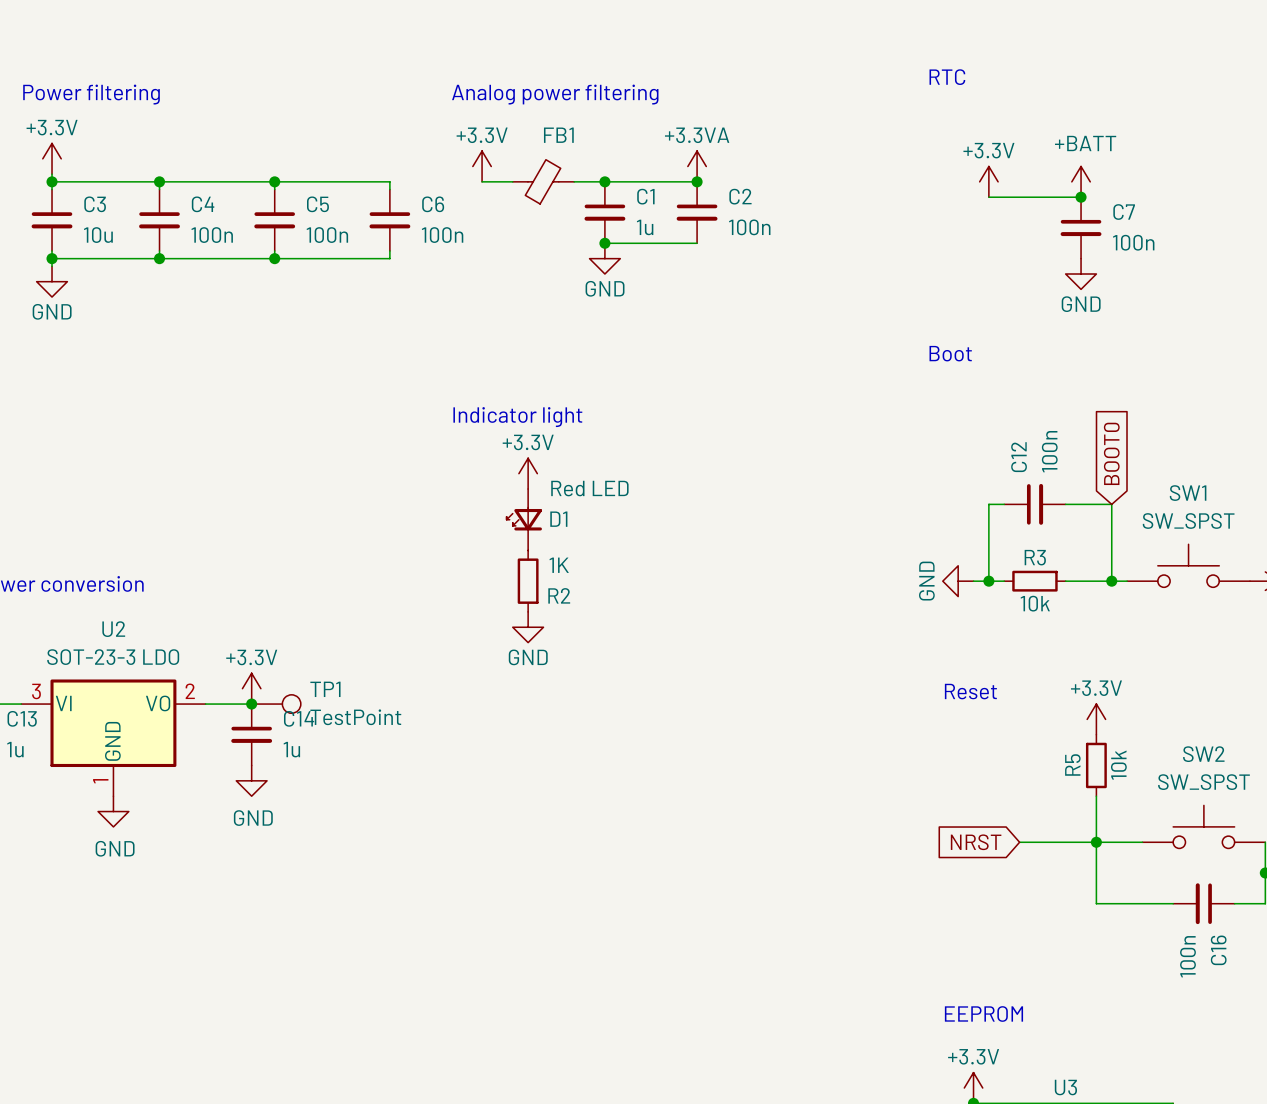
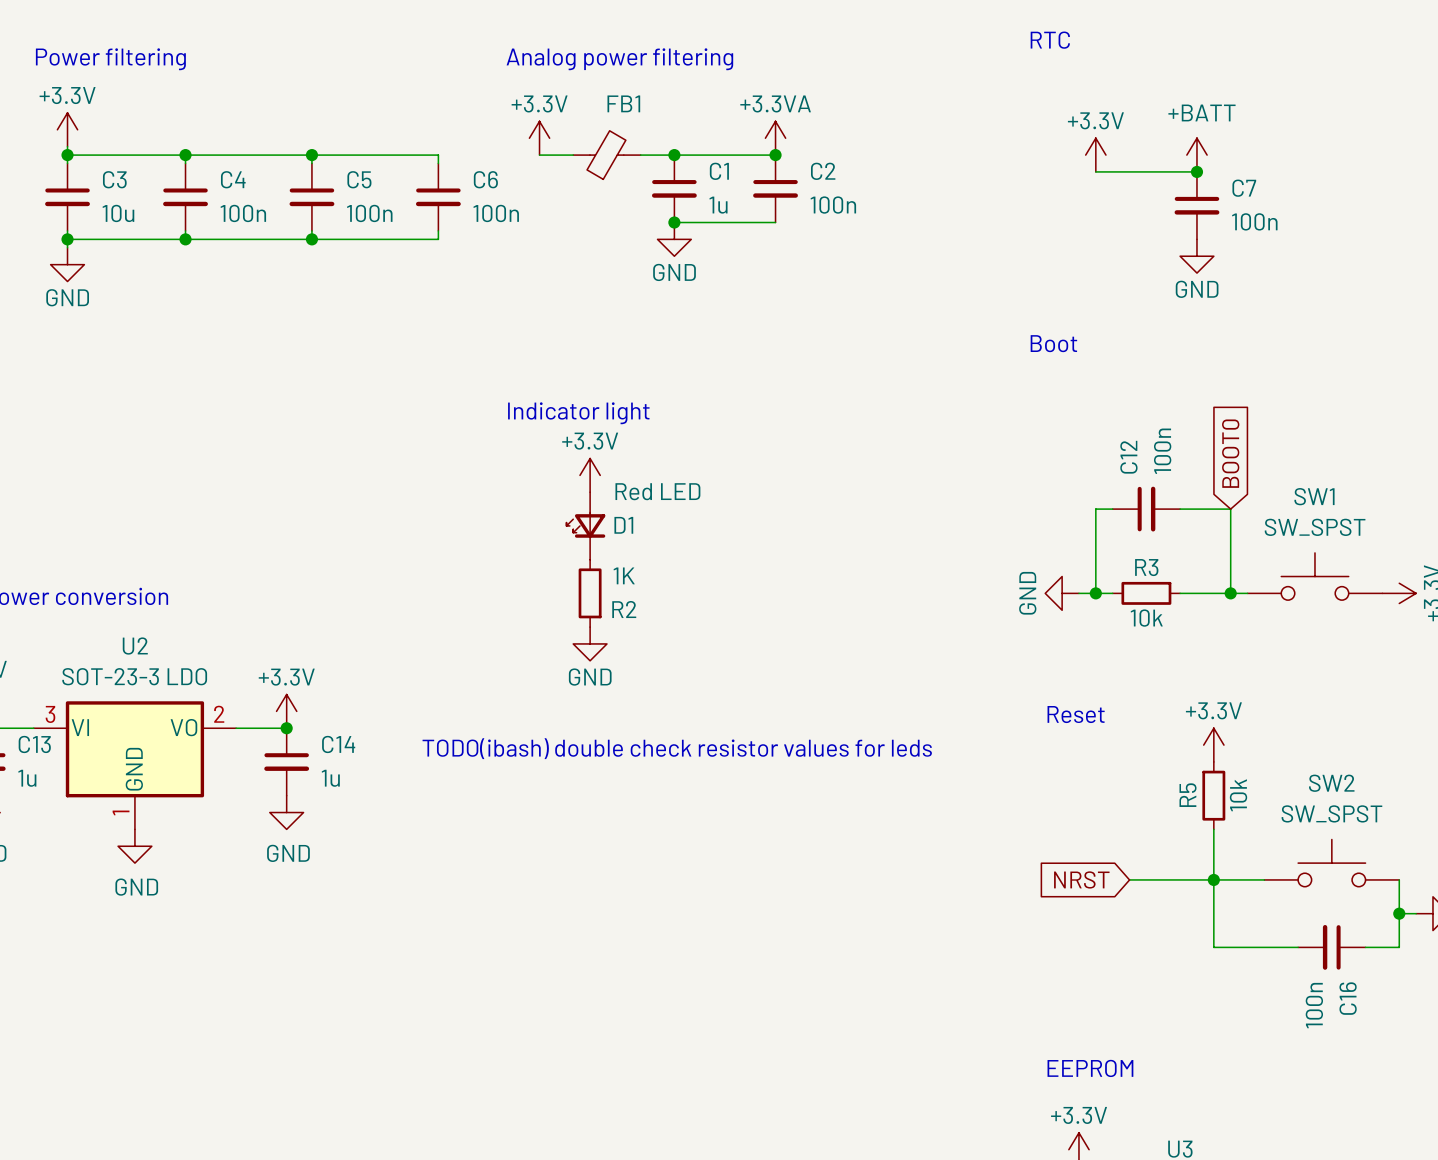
TP1: TestPoint (276, 704) -> none
text: none -> TODO(ibash) double check resistor values for leds (677, 748)

